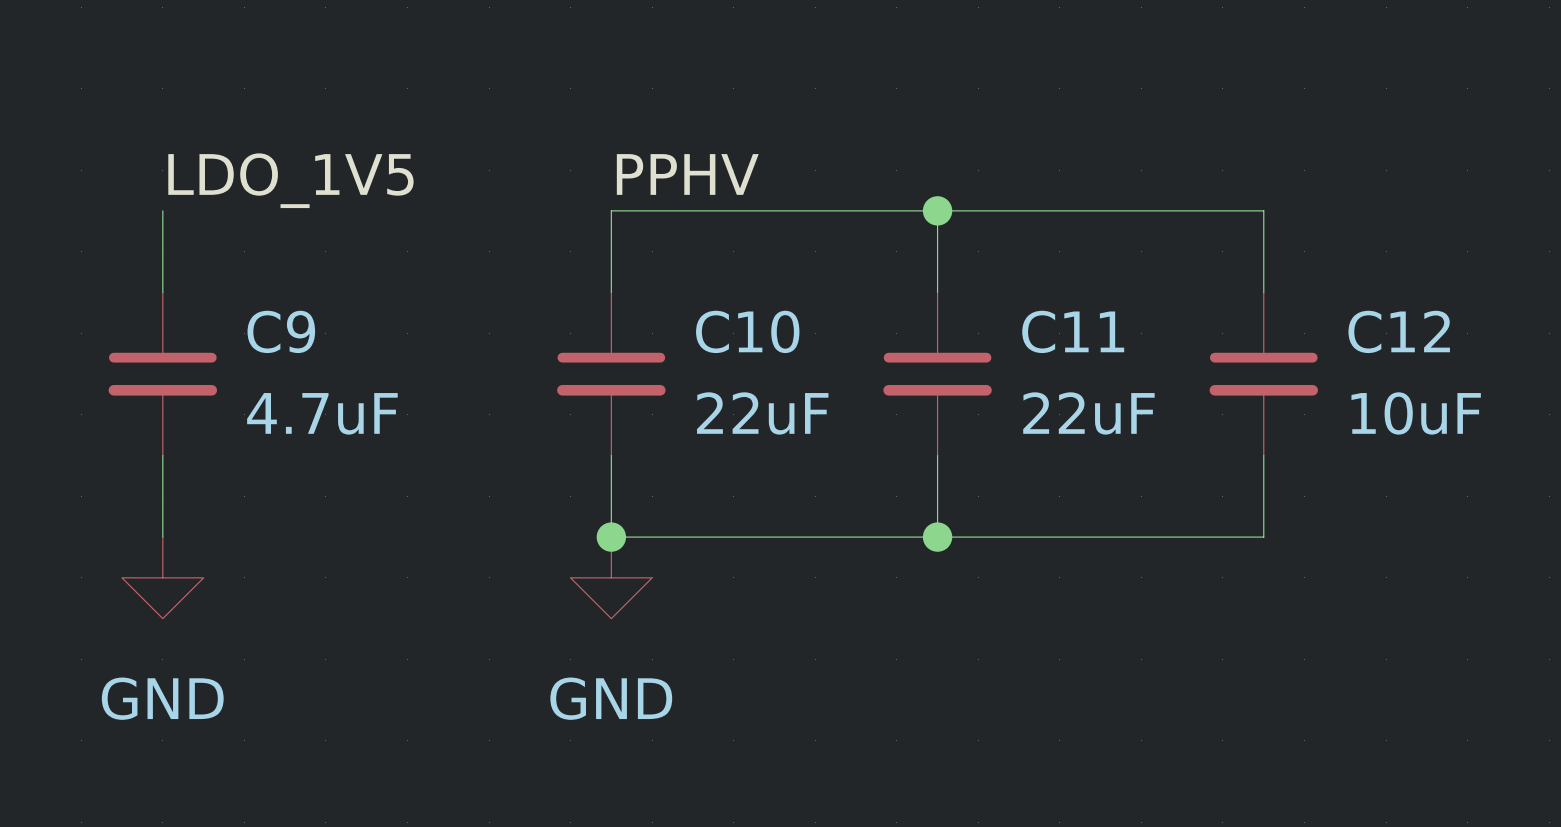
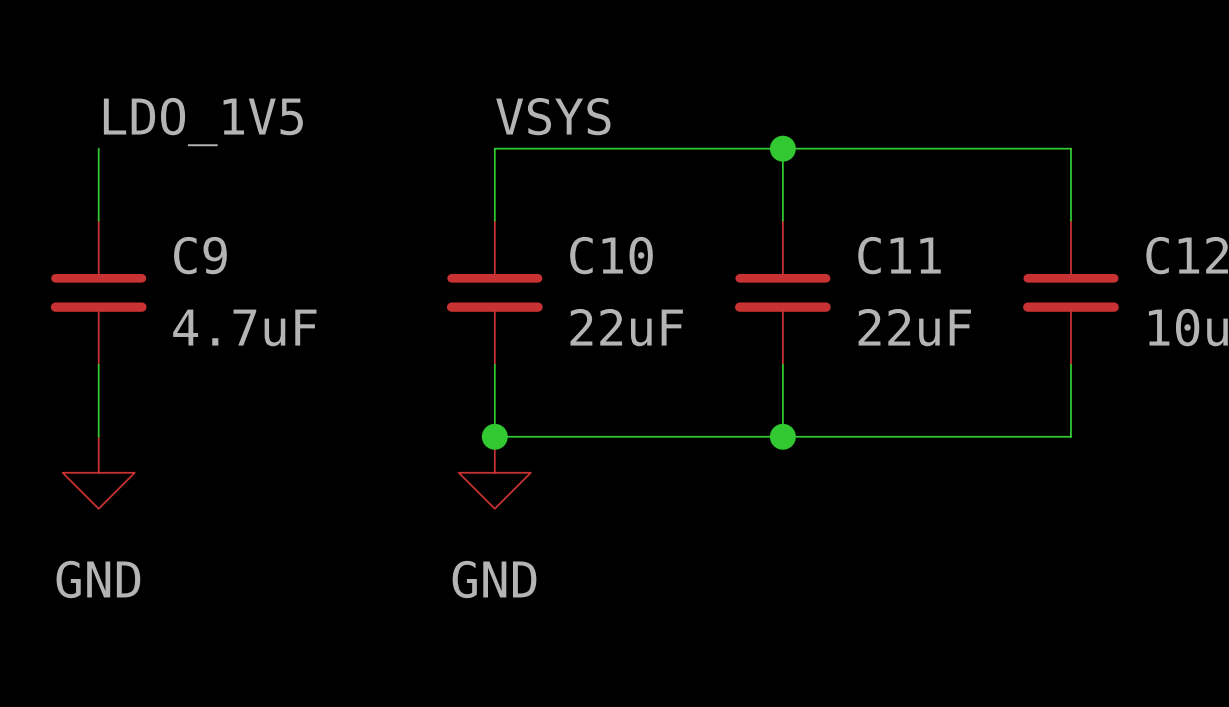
label: PPHV (687, 174) -> VSYS (553, 116)

